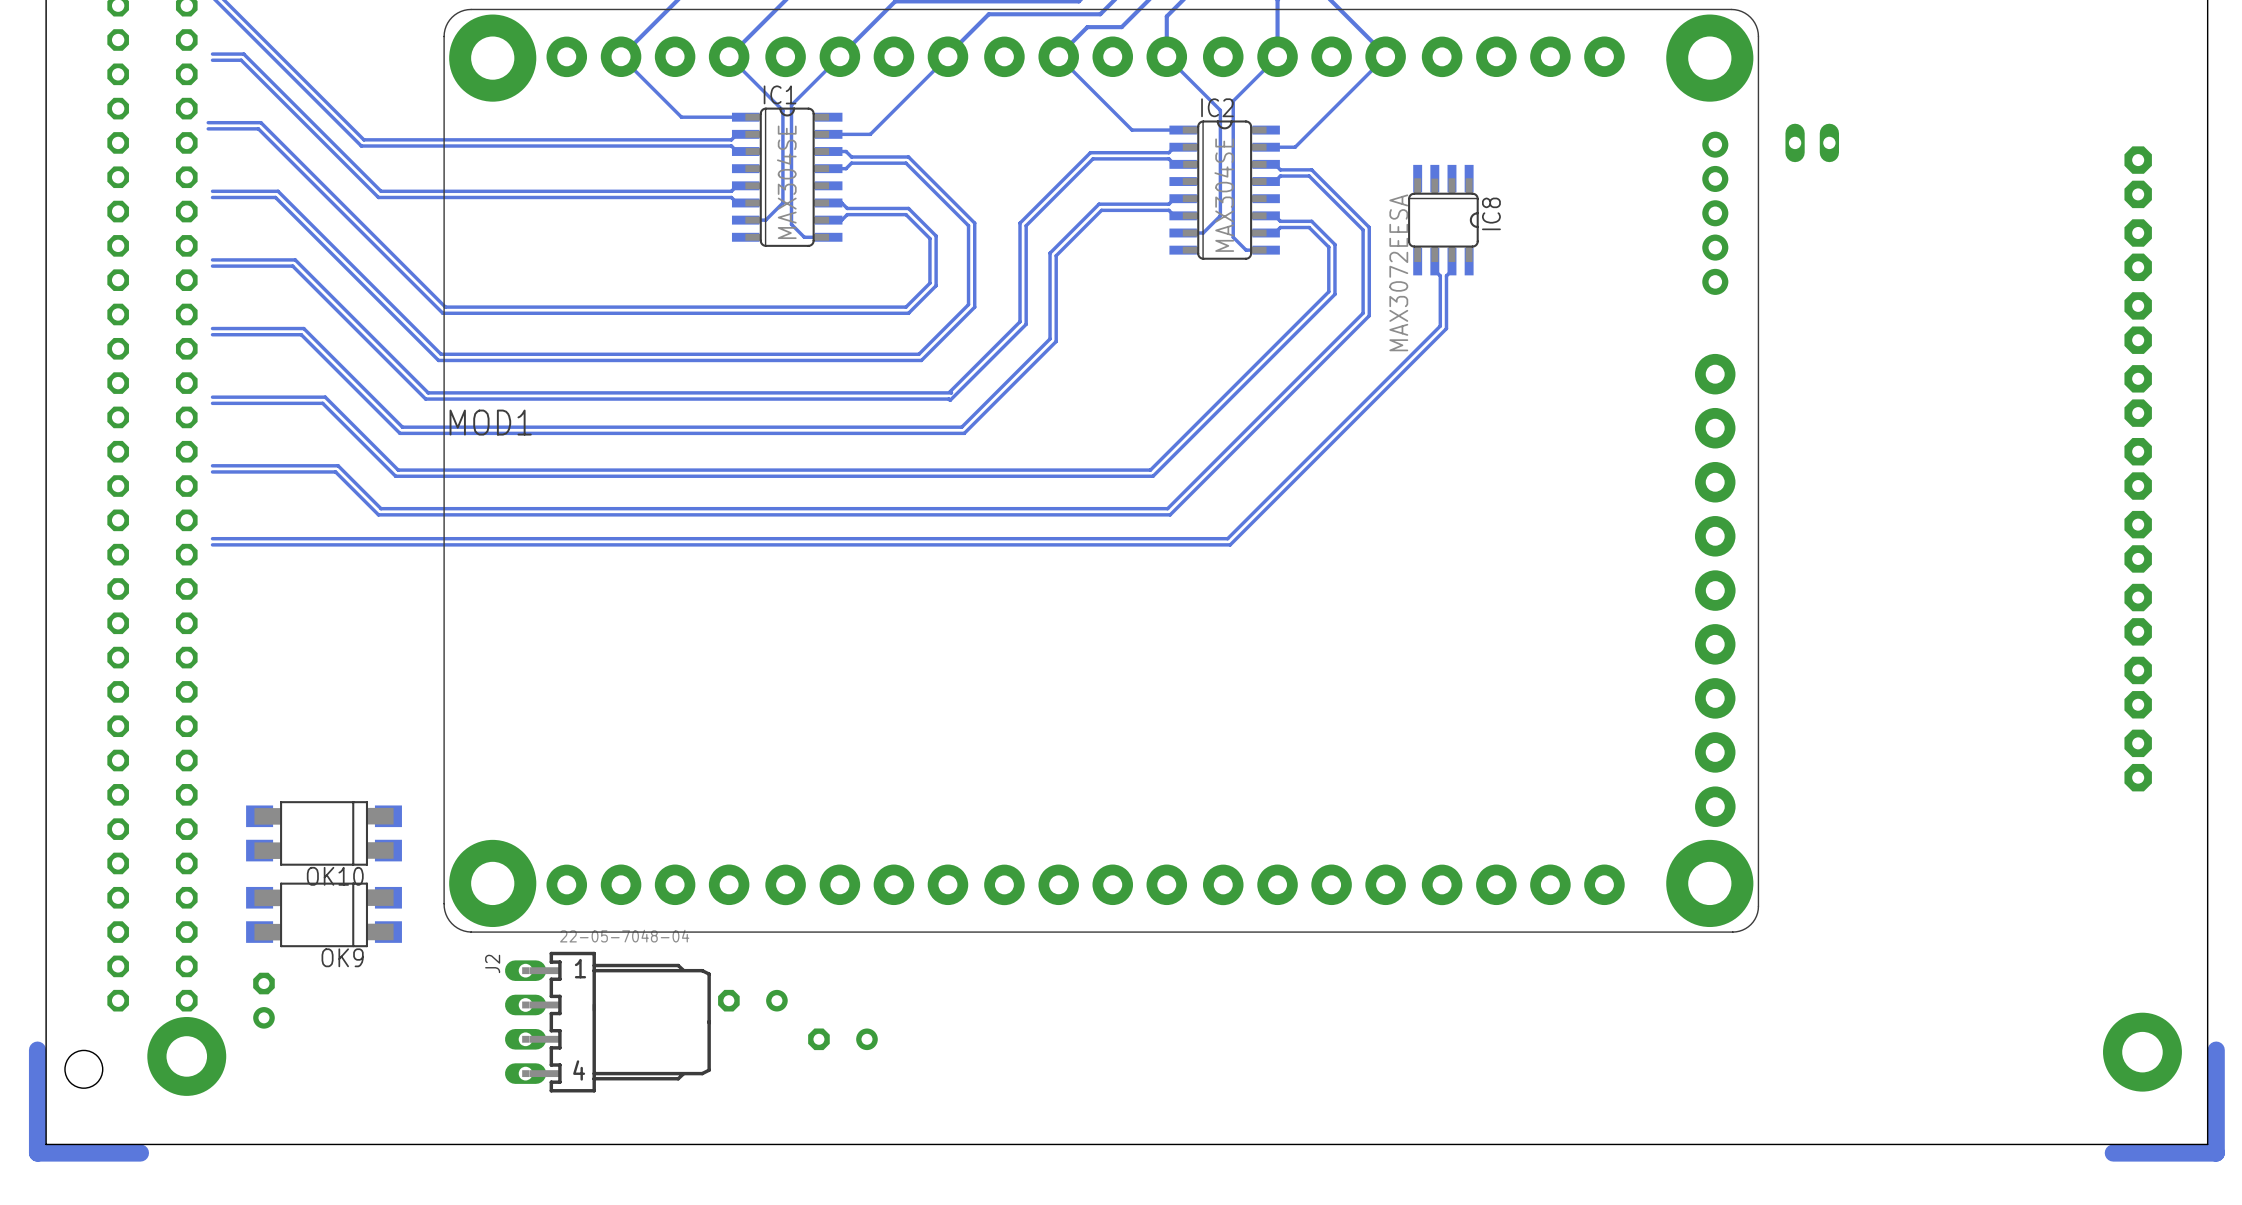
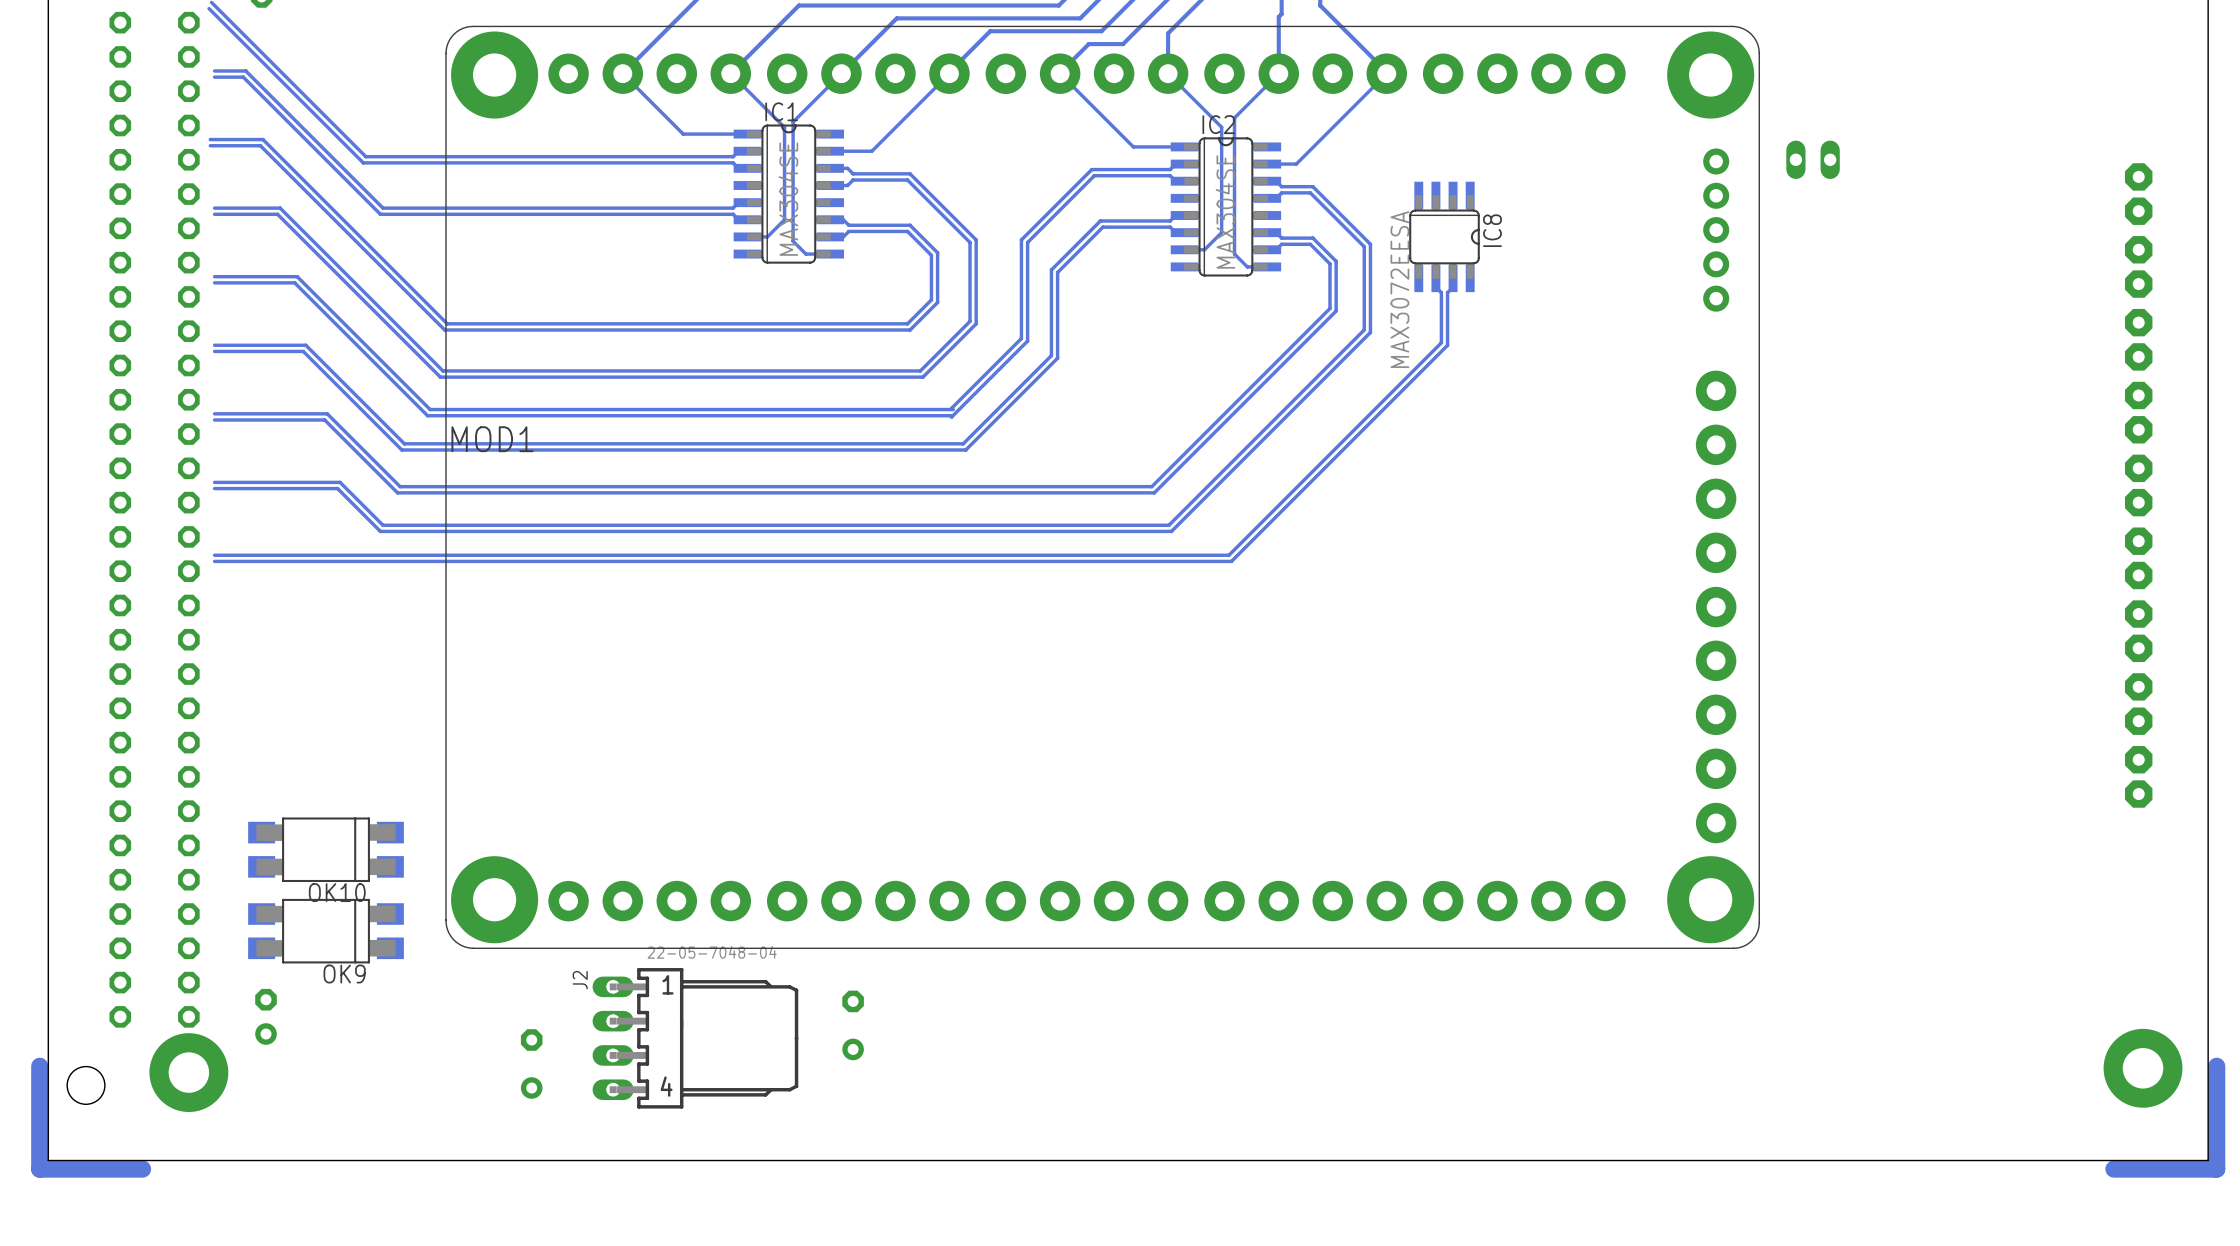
part: (752, 1000) -> none
J2 position: (607, 1022) -> (695, 1038)
part rotation: 0° (842, 1039) -> 90° clockwise (853, 1025)
part: none -> (531, 1064)

